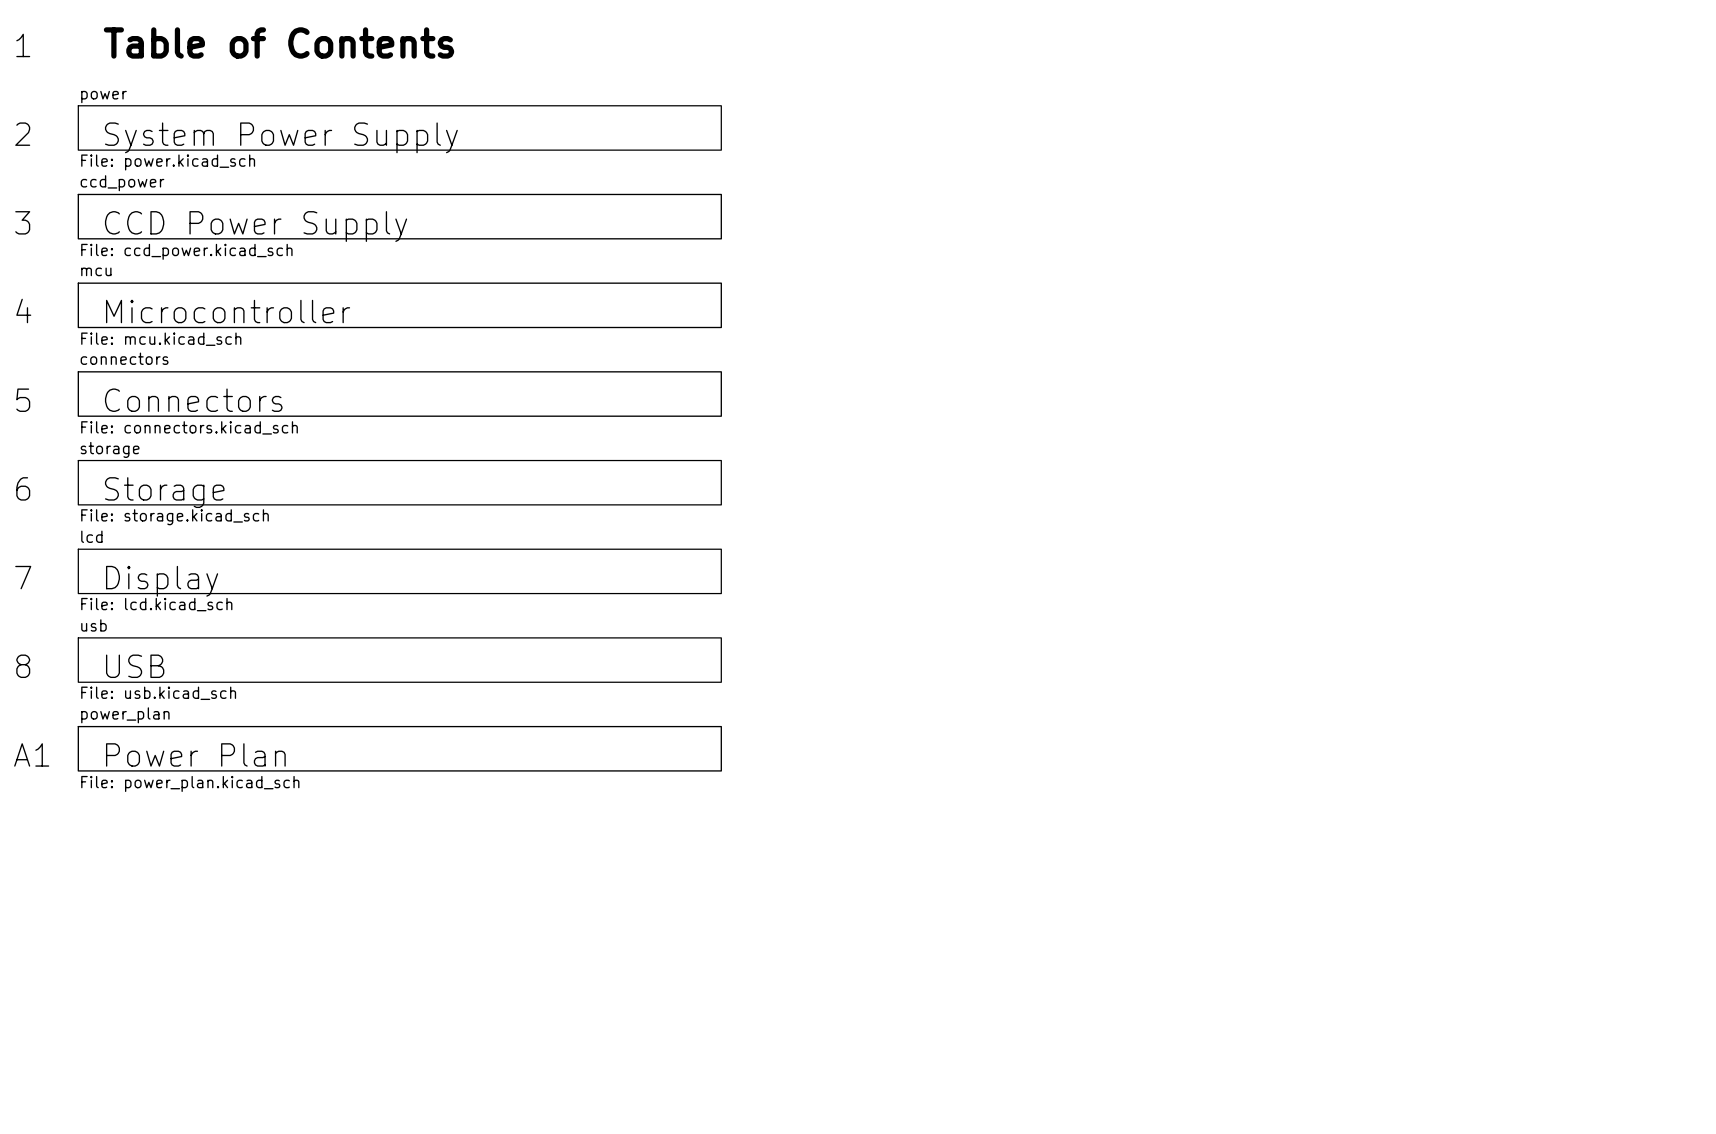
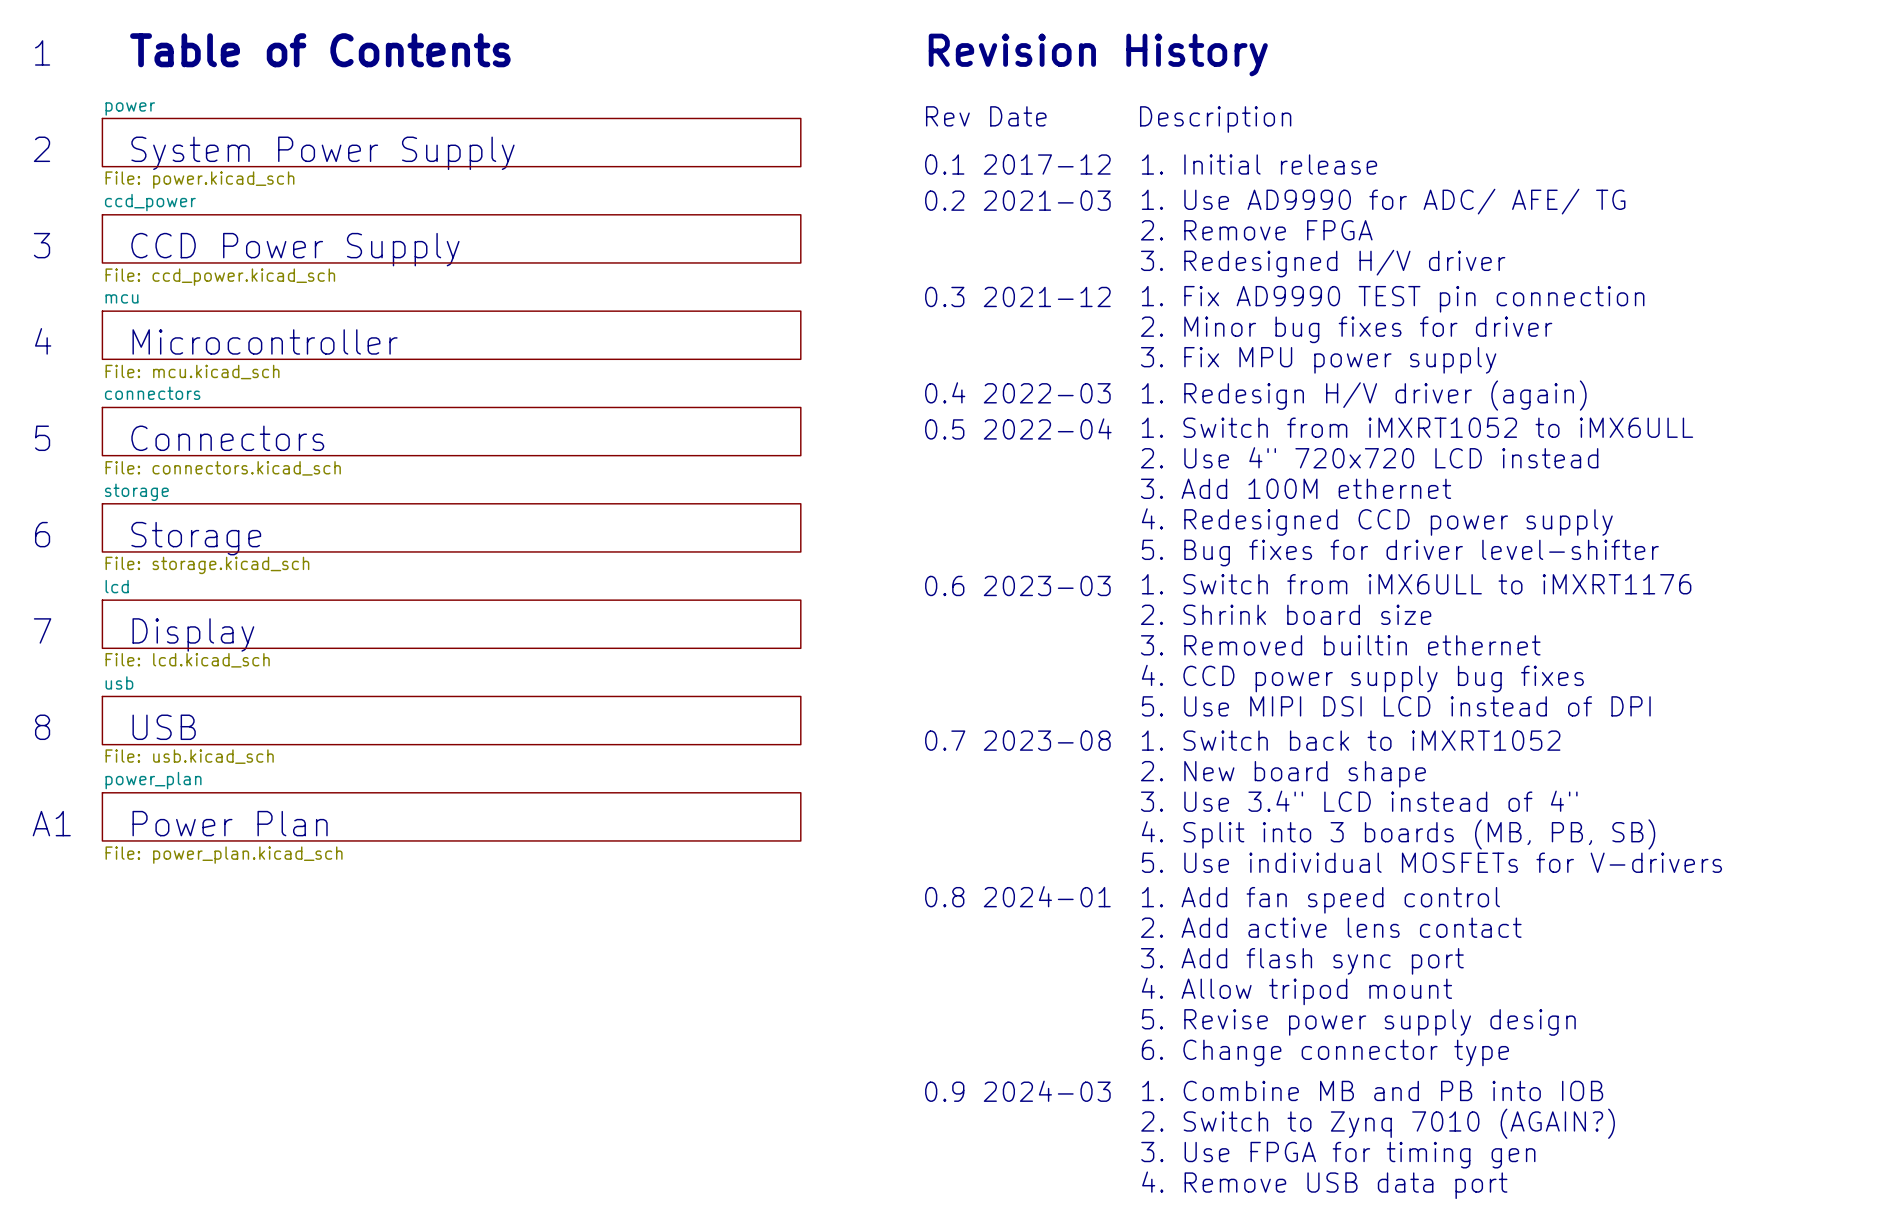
text: none -> Revision History (1098, 54)
text: none -> Rev Date Description (1108, 119)
text: none -> 0.1 2017-12 (1017, 164)
text: none -> 1. Initial release (1259, 164)
text: none -> 0.2 2021-03 (1017, 200)
text: none -> 1. Use AD9990 for ADC/ AFE/ TG (1383, 201)
text: none -> 2. Remove FPGA (1256, 230)
text: none -> 3. Redesigned H/V driver (1323, 263)
text: none -> 0.3 2021-12 (1017, 296)
text: none -> 1. Fix AD9990 TEST pin connection (1393, 299)
text: none -> 2. Minor bug fixes for driver (1346, 329)
text: none -> 3. Fix MPU power supply (1318, 360)
text: none -> 0.4 2022-03 (1017, 392)
text: none -> 1. Redesign H/V driver (again) (1364, 395)
text: none -> 1. Switch from iMXRT1052 to iMX6ULL (1417, 427)
text: none -> 0.5 2022-04 (1018, 428)
text: none -> 2. Use 4" 720x720 LCD instead (1369, 457)
text: none -> 3. Add 100M ethernet (1296, 488)
text: none -> 4. Redesigned CCD power supply (1377, 522)
text: none -> 5. Bug fixes for driver level-shifter (1400, 553)
text: none -> 1. Switch from iMX6ULL to iMXRT1176 (1416, 584)
text: none -> 0.6 2023-03 (1017, 585)
text: none -> 2. Shrink board size (1286, 614)
text: none -> 3. Removed builtin ethernet (1340, 645)
text: none -> 4. CCD power supply bug fixes (1362, 678)
text: none -> 5. Use MIPI DSI LCD instead of DPI (1396, 706)
text: none -> 0.7 2023-08 (1017, 740)
text: none -> 1. Switch back to iMXRT1052 (1351, 740)
text: none -> 2. New board shape (1283, 774)
text: none -> 3. Use 3.4" LCD instead of 4" (1359, 801)
text: none -> 4. Split into 3 boards (MB, PB, SB) (1398, 834)
text: none -> 5. Use individual MOSFETs for V-drivers (1431, 862)
text: none -> 0.8 2024-01 (1017, 896)
text: none -> 1. Add fan speed control (1320, 900)
text: none -> 2. Add active lens contact (1331, 927)
text: none -> 3. Add flash sync port (1302, 961)
text: none -> 4. Allow tripod mount (1296, 991)
text: none -> 5. Revise power supply design (1358, 1022)
text: none -> 6. Change connector type (1325, 1052)
text: none -> 0.9 2024-03 (1017, 1091)
text: none -> 1. Combine MB and PB into IOB (1372, 1090)
text: none -> 2. Switch to Zynq 7010 (AGAIN?) (1378, 1123)
text: none -> 3. Use FPGA for timing gen (1338, 1155)
text: none -> 4. Remove USB data port (1324, 1185)

